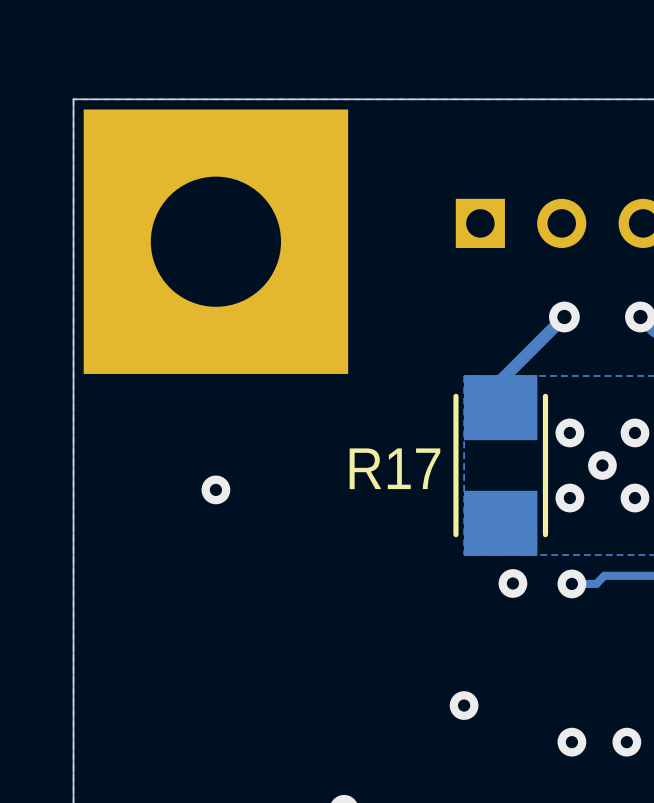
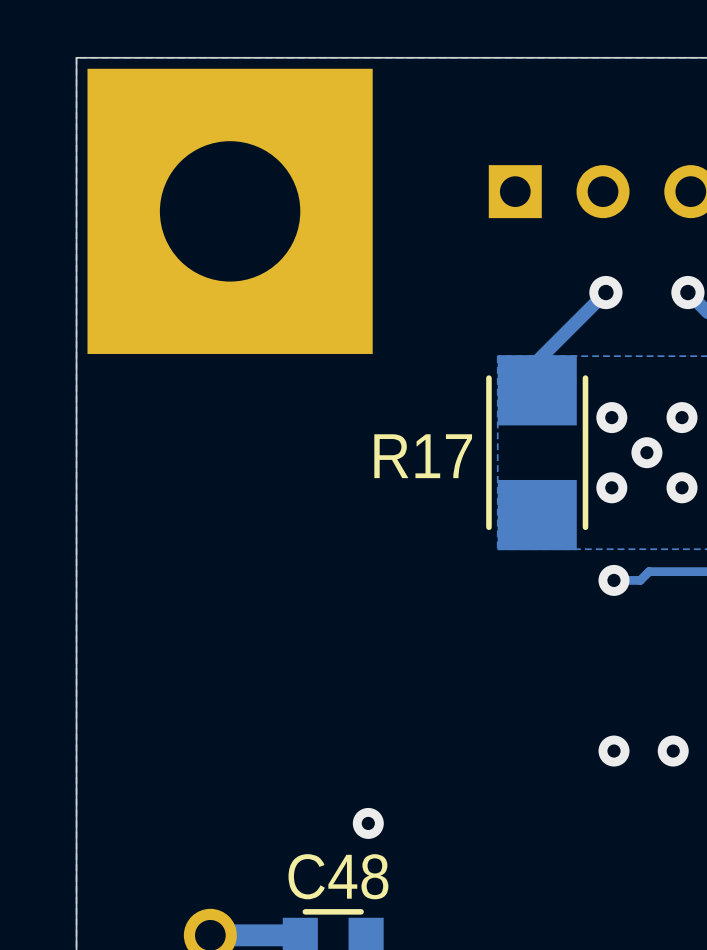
via: (215, 489) -> none
via: (512, 583) -> none
via: (464, 705) -> none

